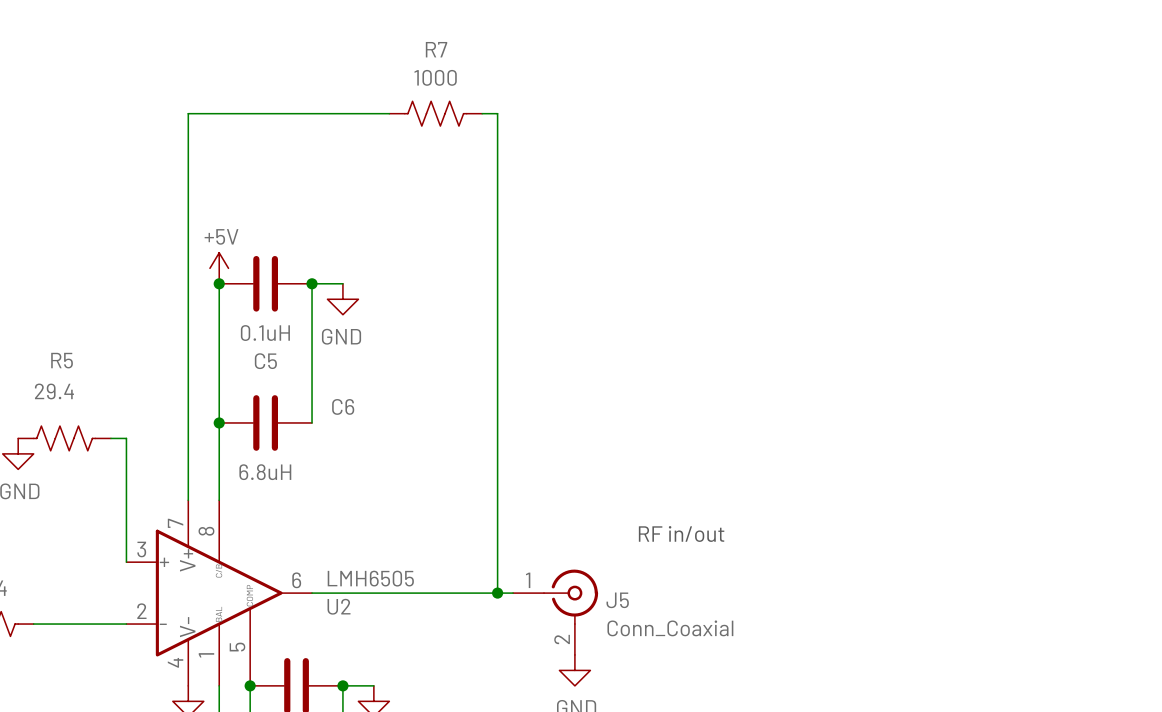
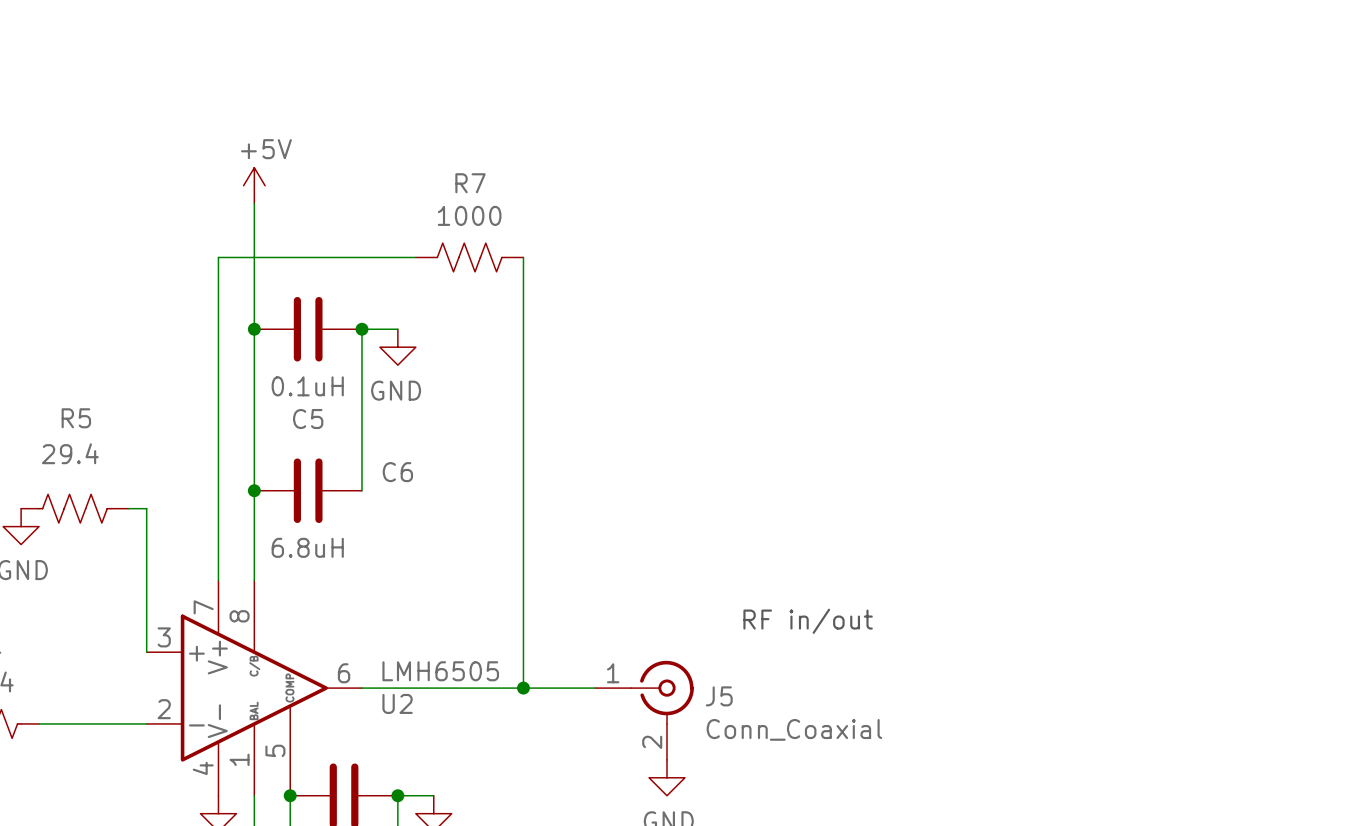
wire: (389, 113) (188, 113) (188, 221) -> (415, 257) (218, 257)
R7 position: (435, 113) -> (469, 257)
wire: (482, 113) (497, 113) (497, 593) -> none
wire: none -> (254, 203) (254, 329)
wire: none -> (523, 257) (523, 688)
power symbol position: +5V (219, 268) -> +5V (254, 185)
junction position: (497, 593) -> (523, 688)

